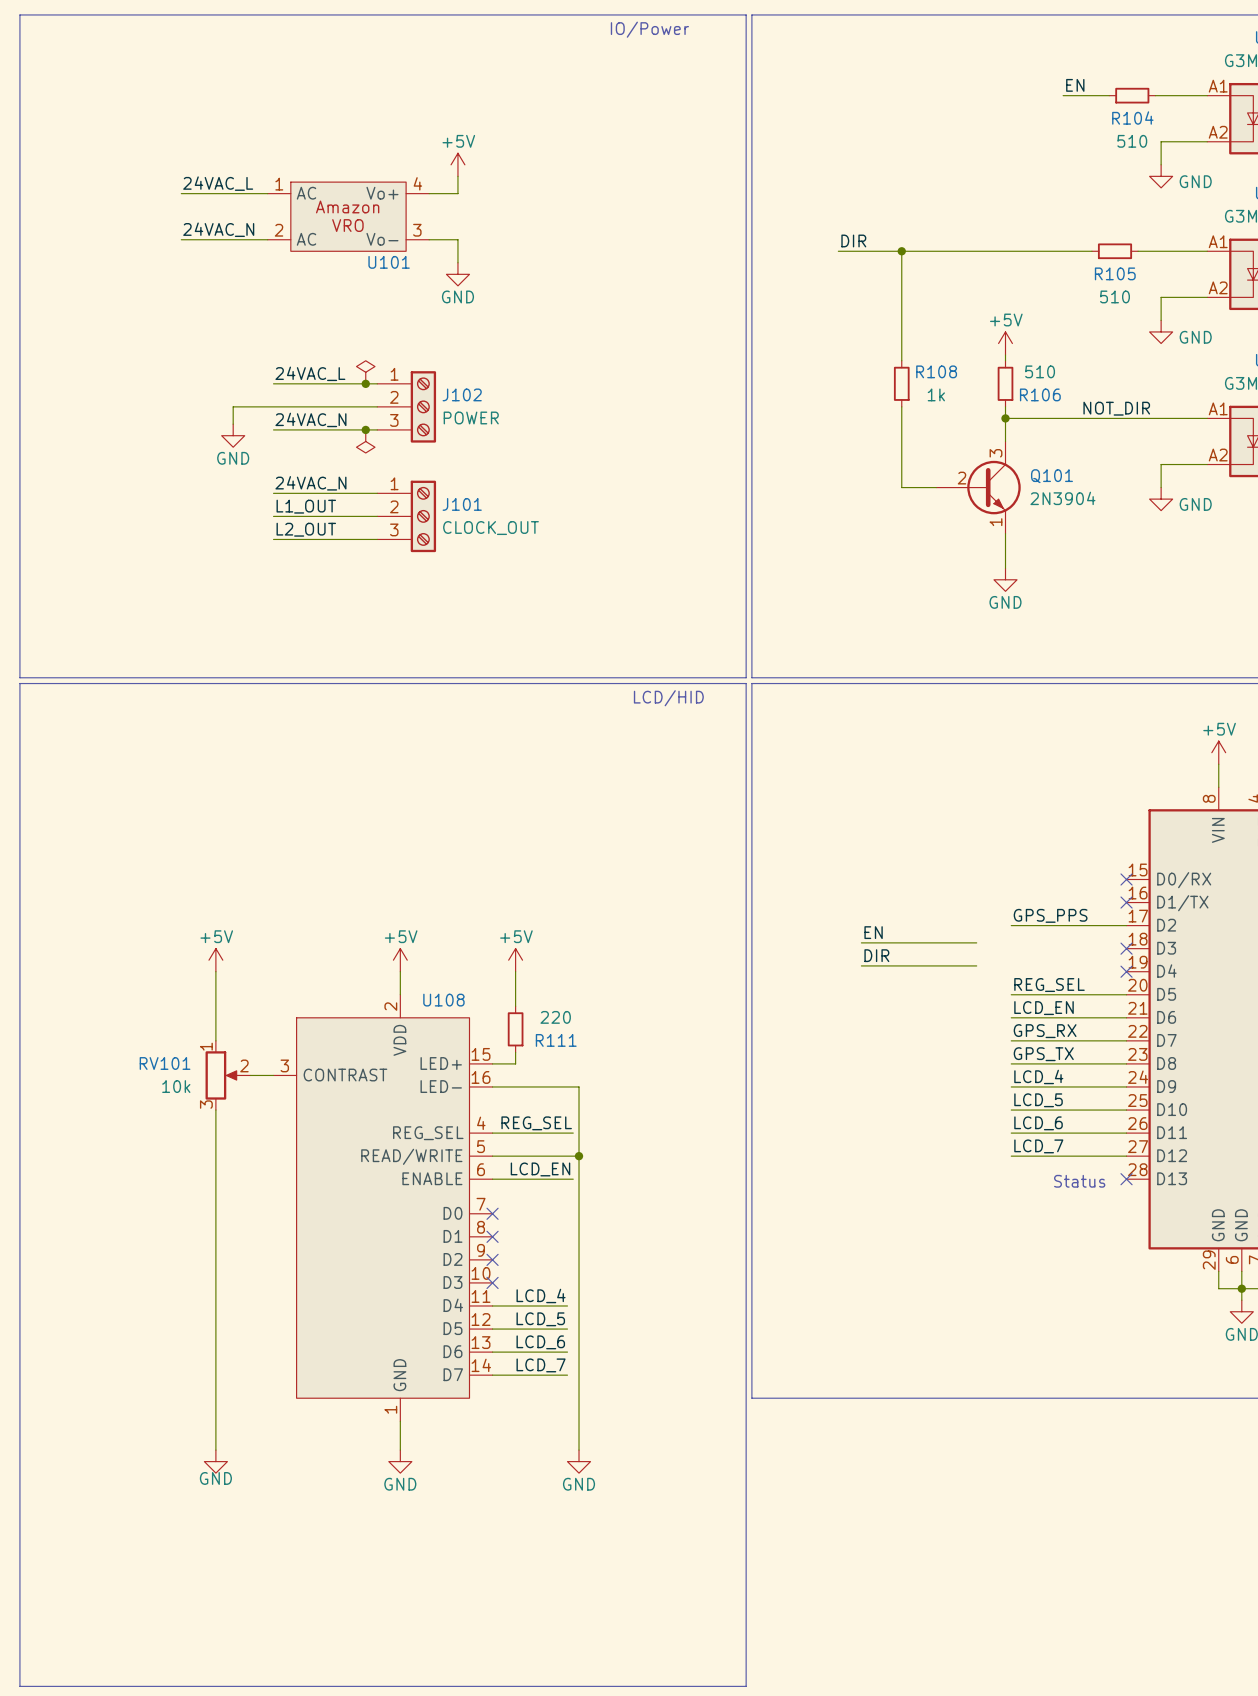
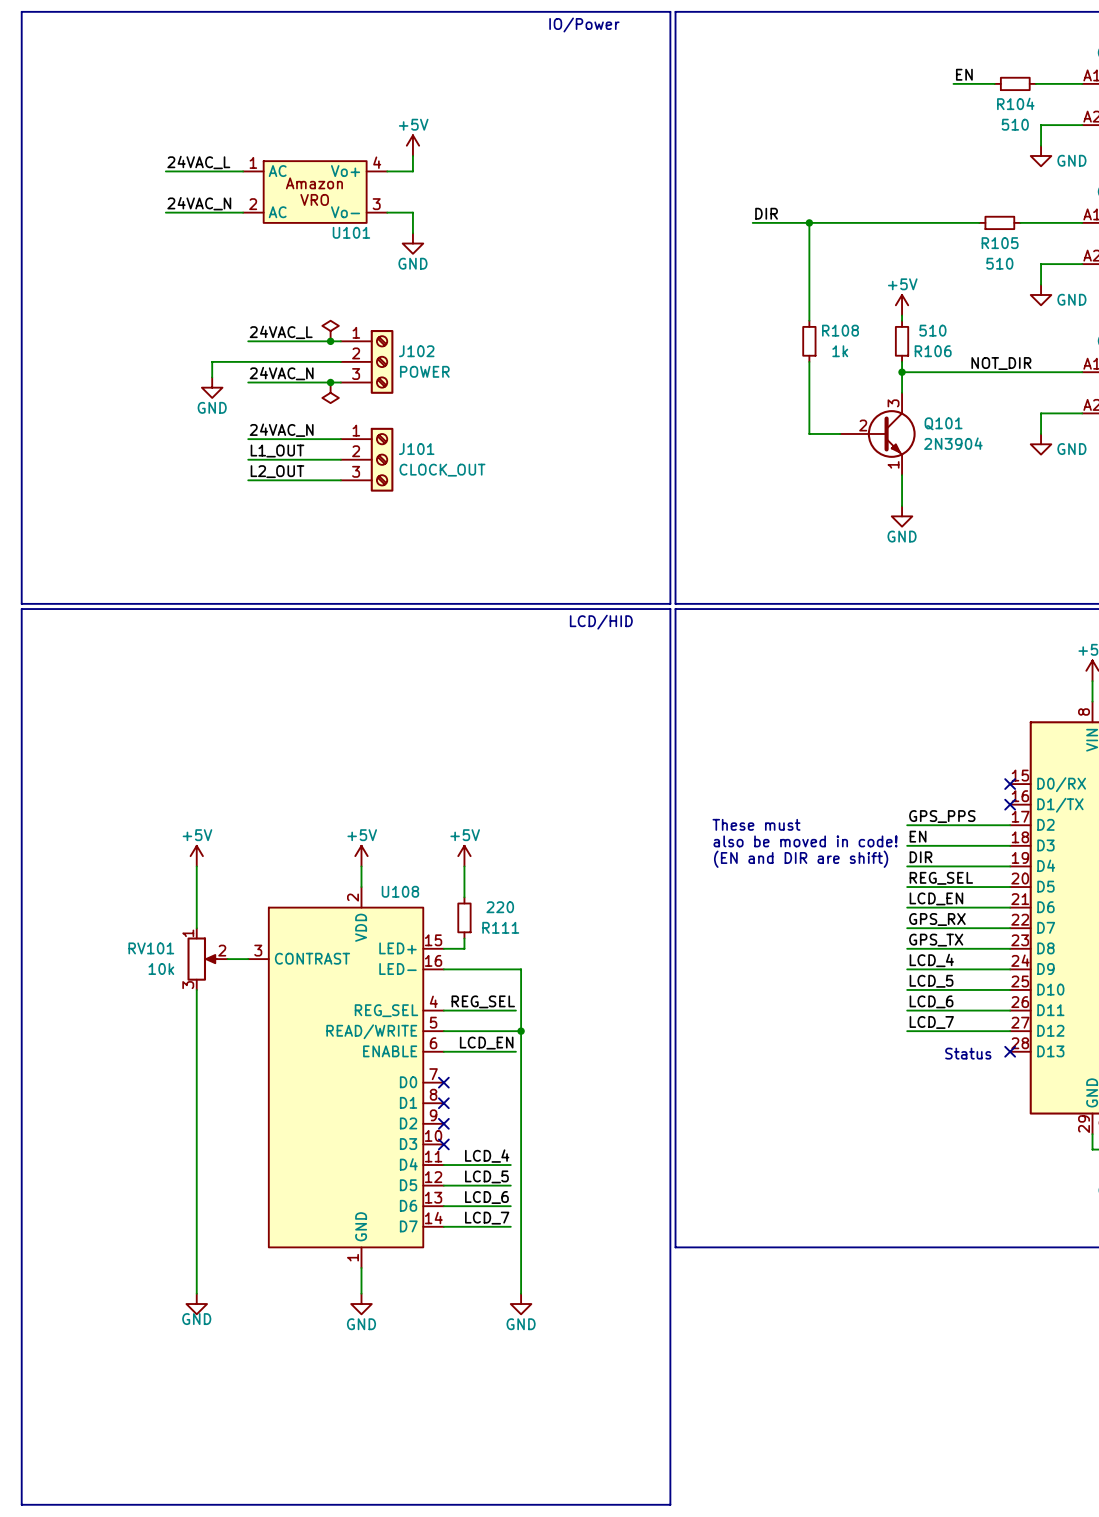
text: none -> These must (756, 824)
label position: EN (873, 932) -> EN (918, 836)
wire: (861, 942) (976, 942) -> (907, 845) (1010, 845)
text: none -> also be moved in code! (805, 841)
no-connect mark: (1126, 948) -> none
label position: DIR (876, 955) -> DIR (920, 857)
text: none -> (EN and DIR are shift) (801, 859)
wire: (861, 965) (976, 965) -> (907, 866) (1010, 866)
no-connect mark: (1126, 971) -> none

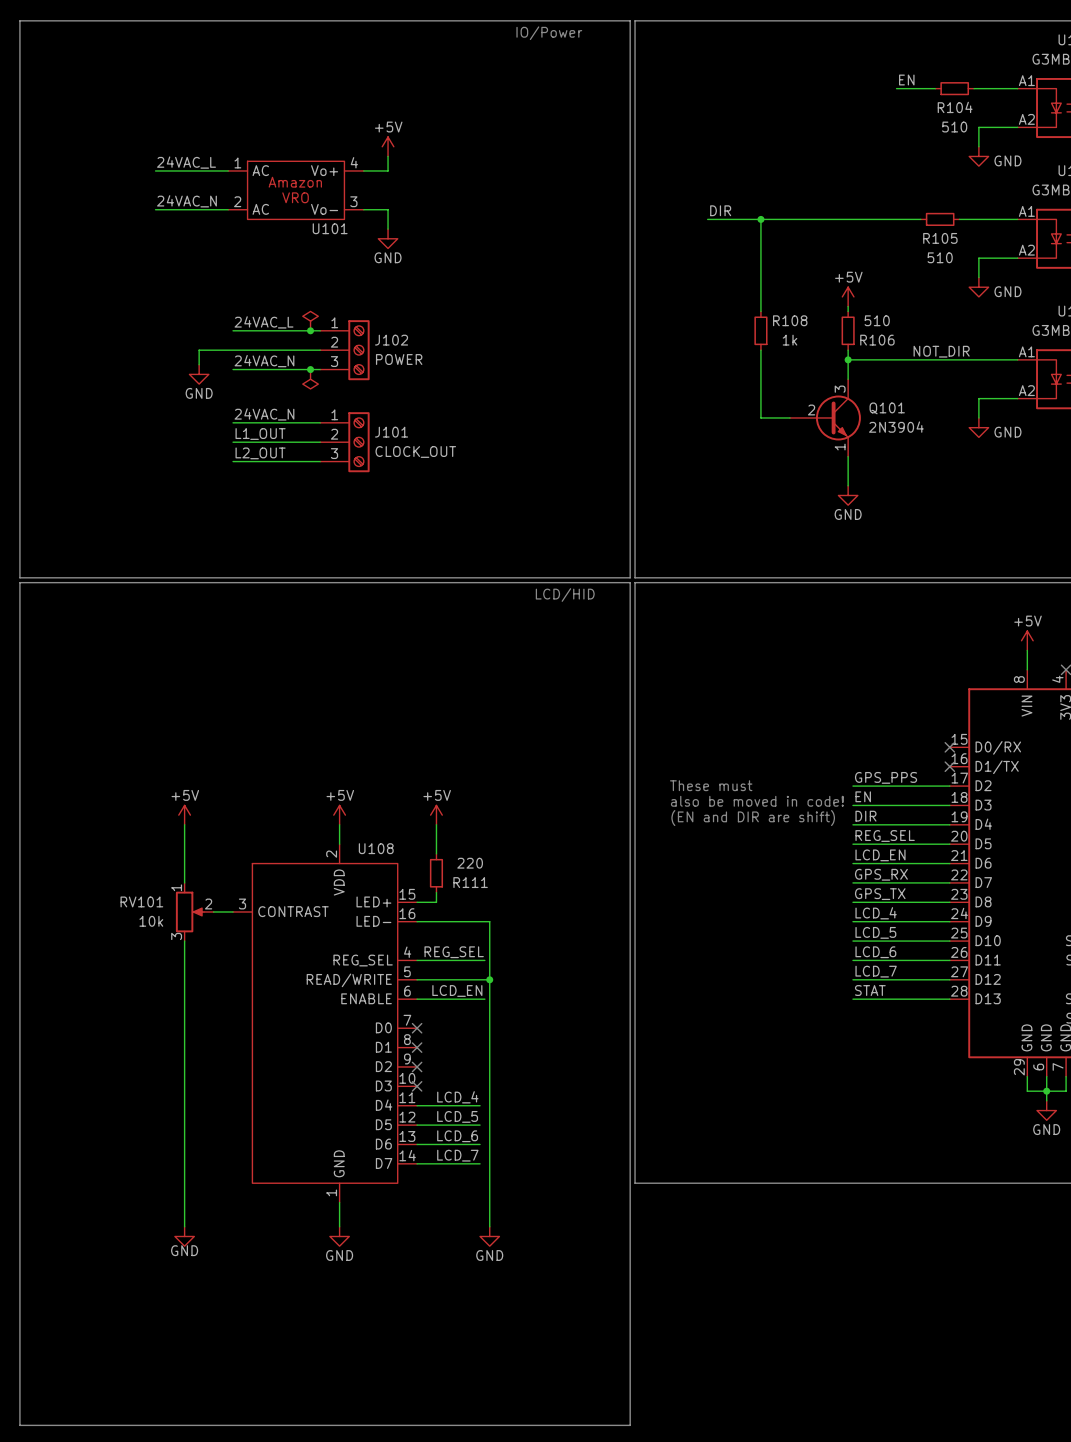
label: none -> STAT (870, 990)
wire: none -> (852, 999) (949, 999)
no-connect mark: (1010, 1051) -> none
text: Status (968, 1053) -> none

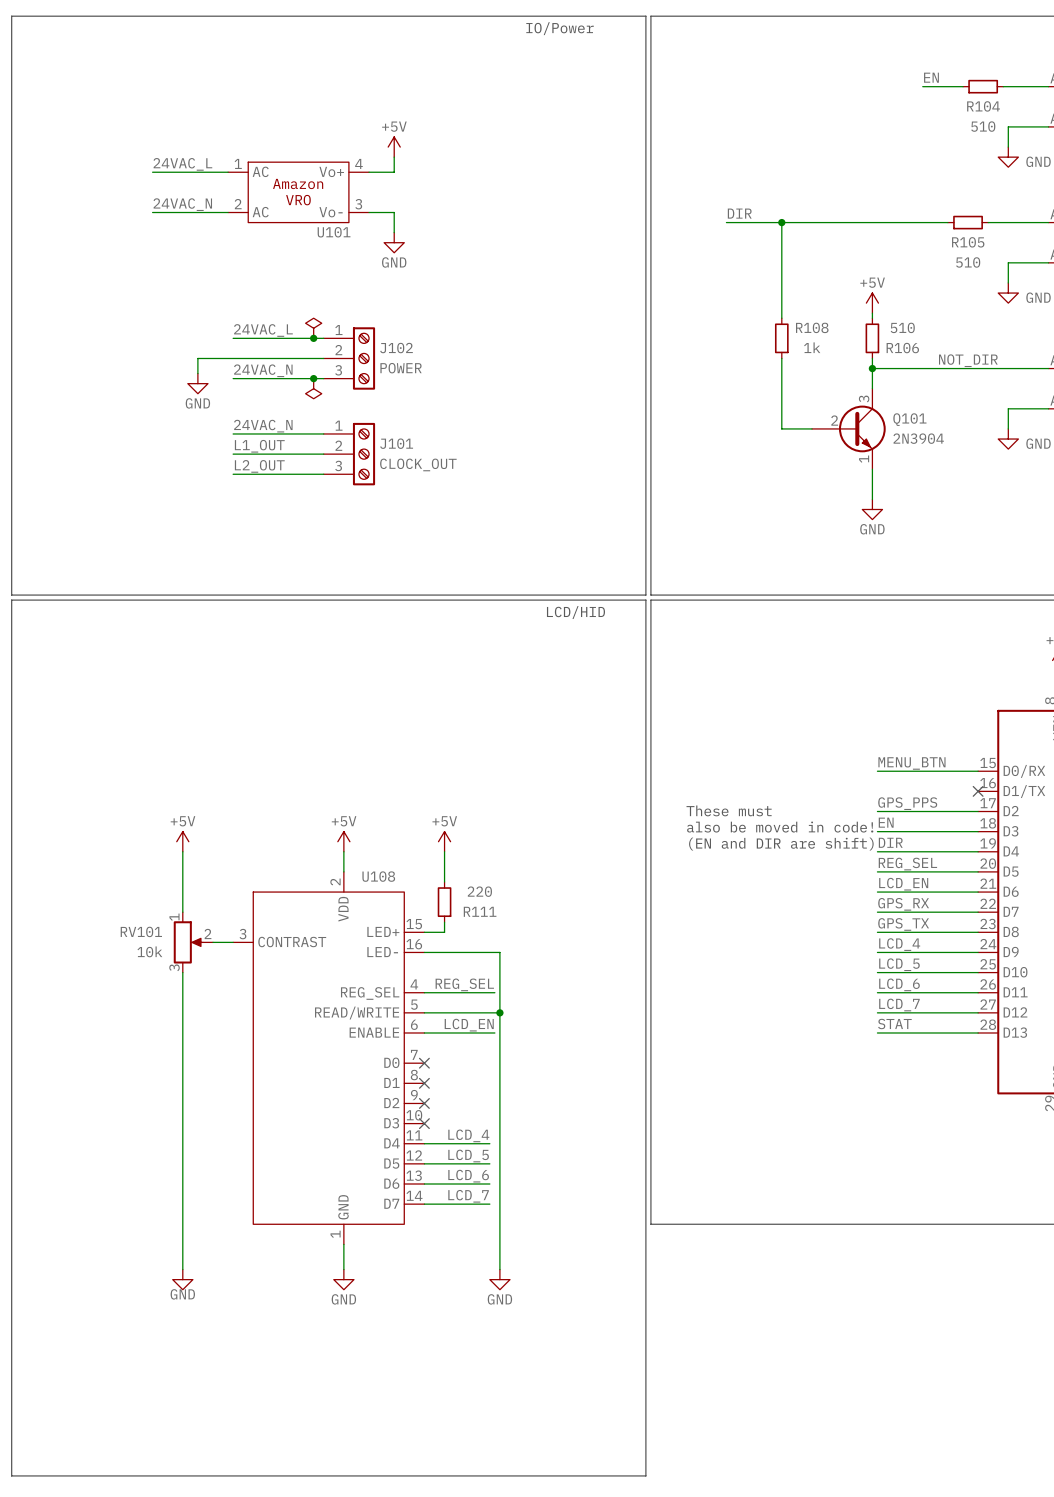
label: none -> MENU_BTN (911, 763)
wire: none -> (877, 771) (978, 771)
no-connect mark: (949, 747) -> none

